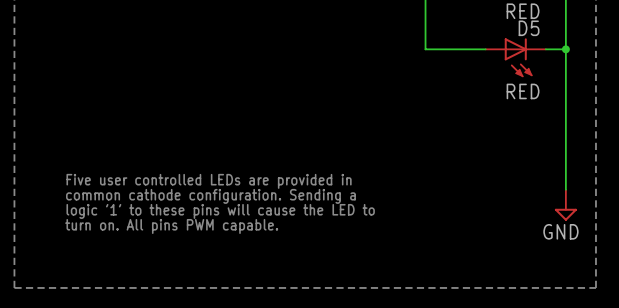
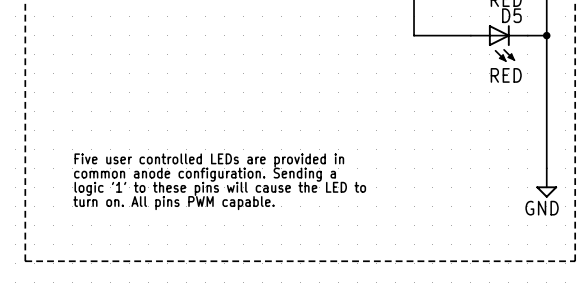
text: common cathode configuration. Sending a (210, 196) -> common anode configuration. Sending a (205, 174)

